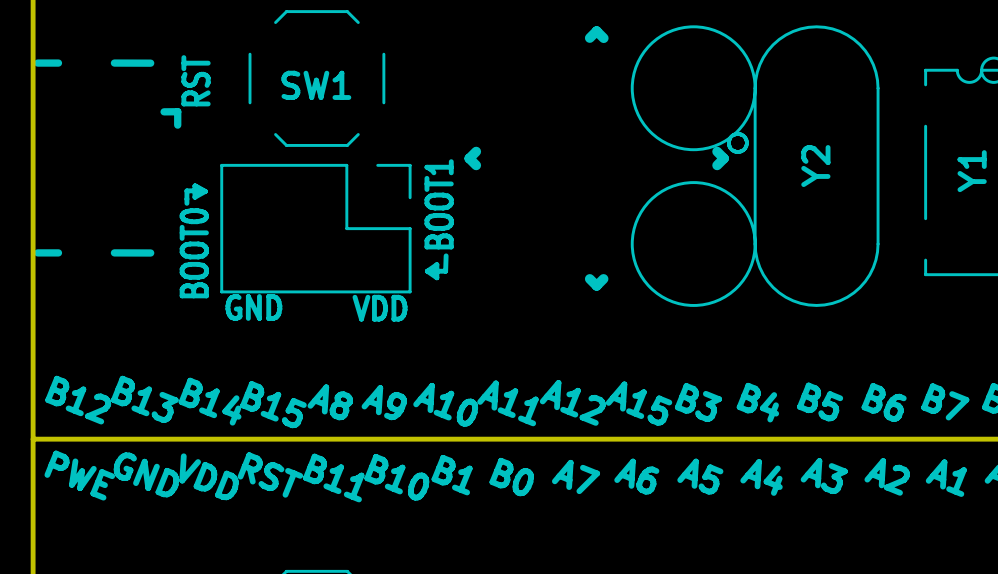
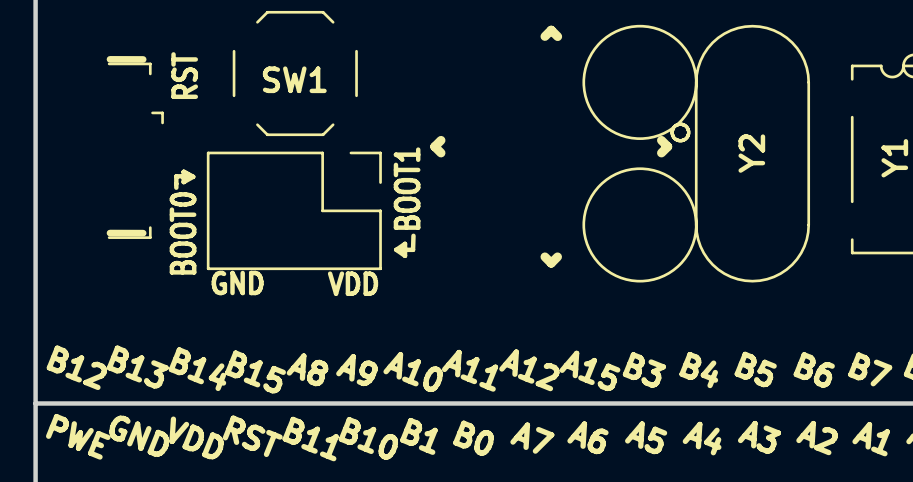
line: (37, 63) (58, 63) -> none
line: none -> (109, 63) (150, 63) (150, 73)
line: (164, 111) (177, 111) (177, 125) -> none
line: none -> (152, 112) (162, 112) (162, 122)
line: none -> (150, 227) (150, 237) (109, 237)
line: (37, 252) (58, 252) -> none

